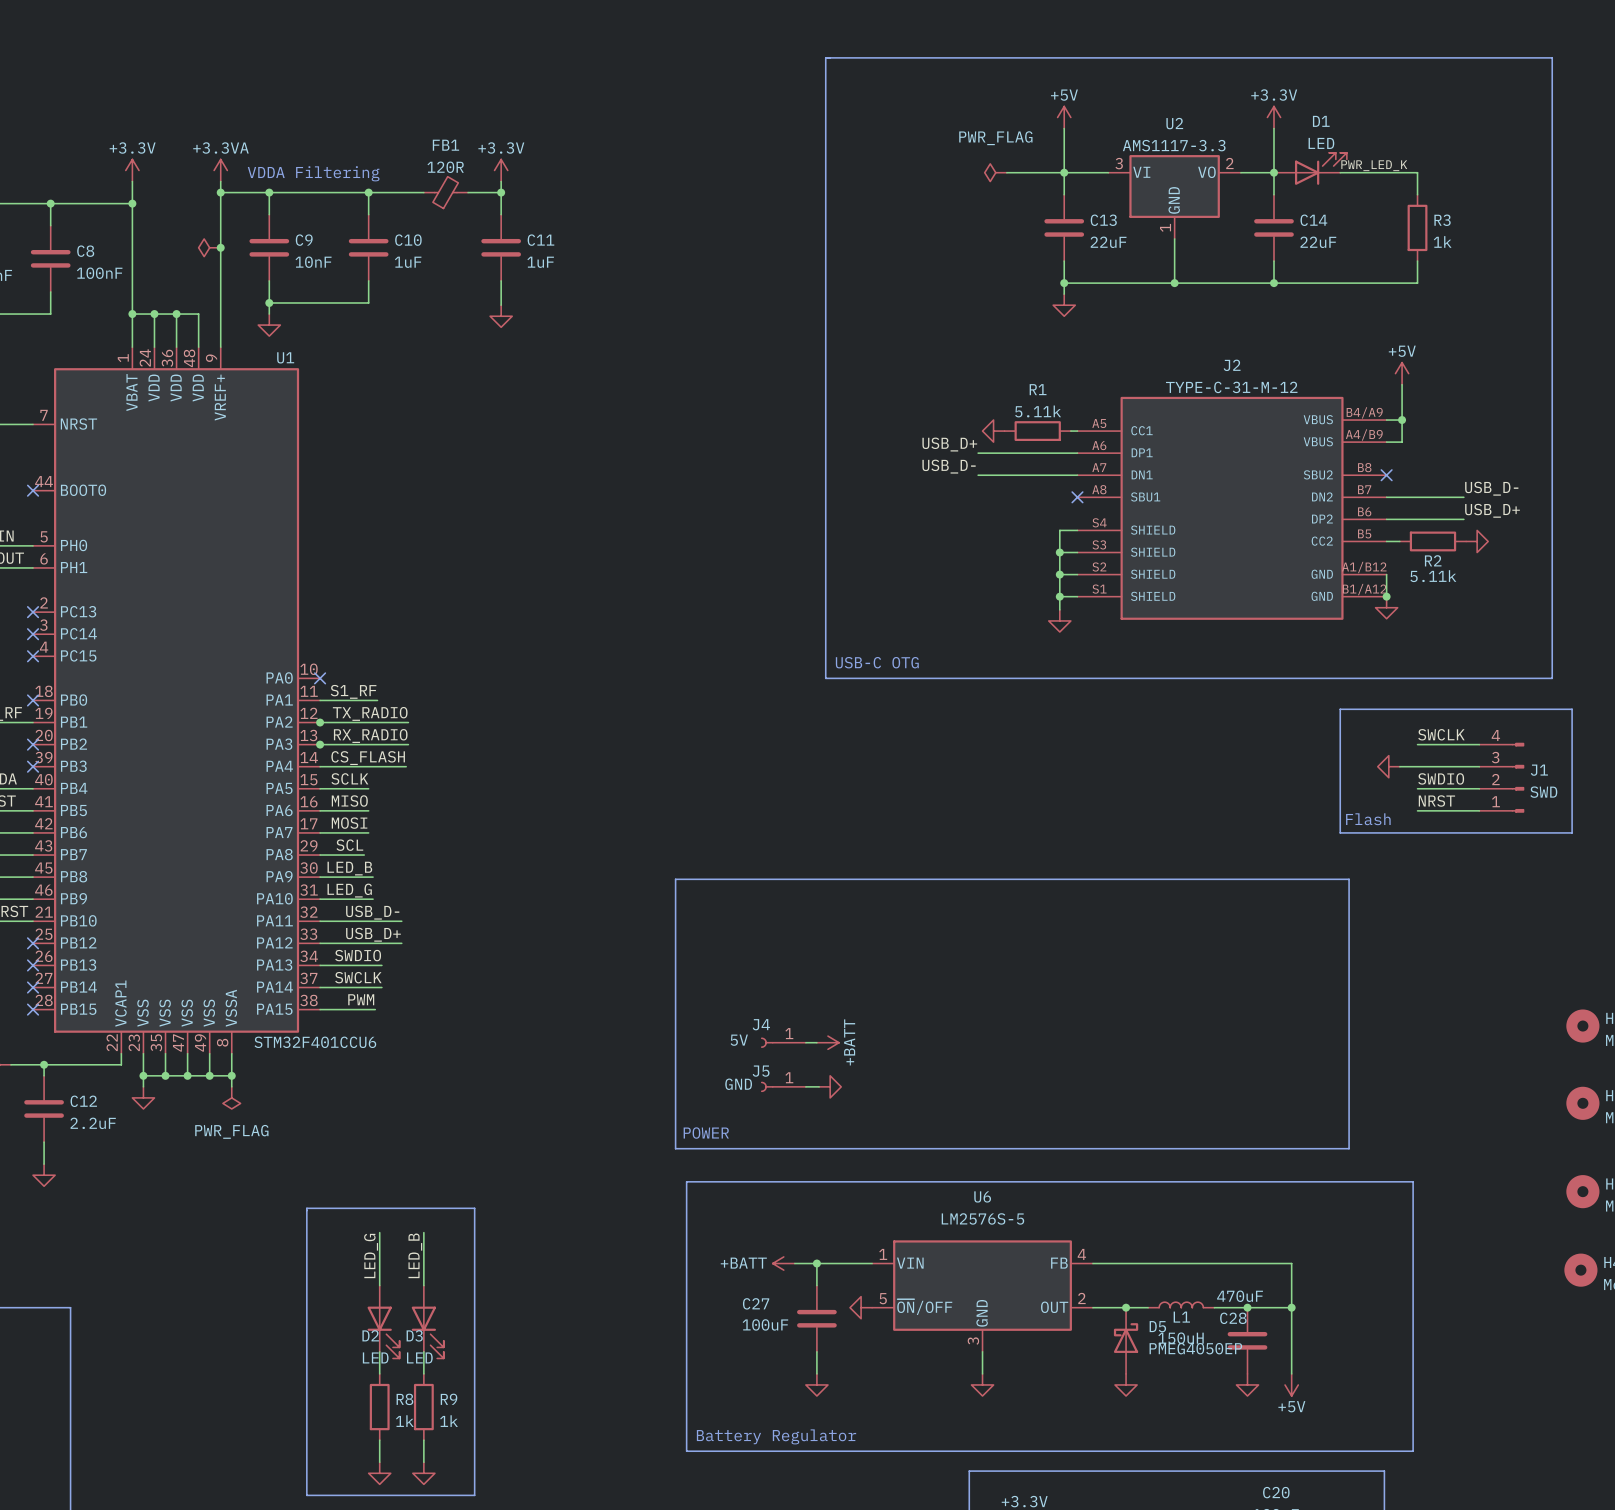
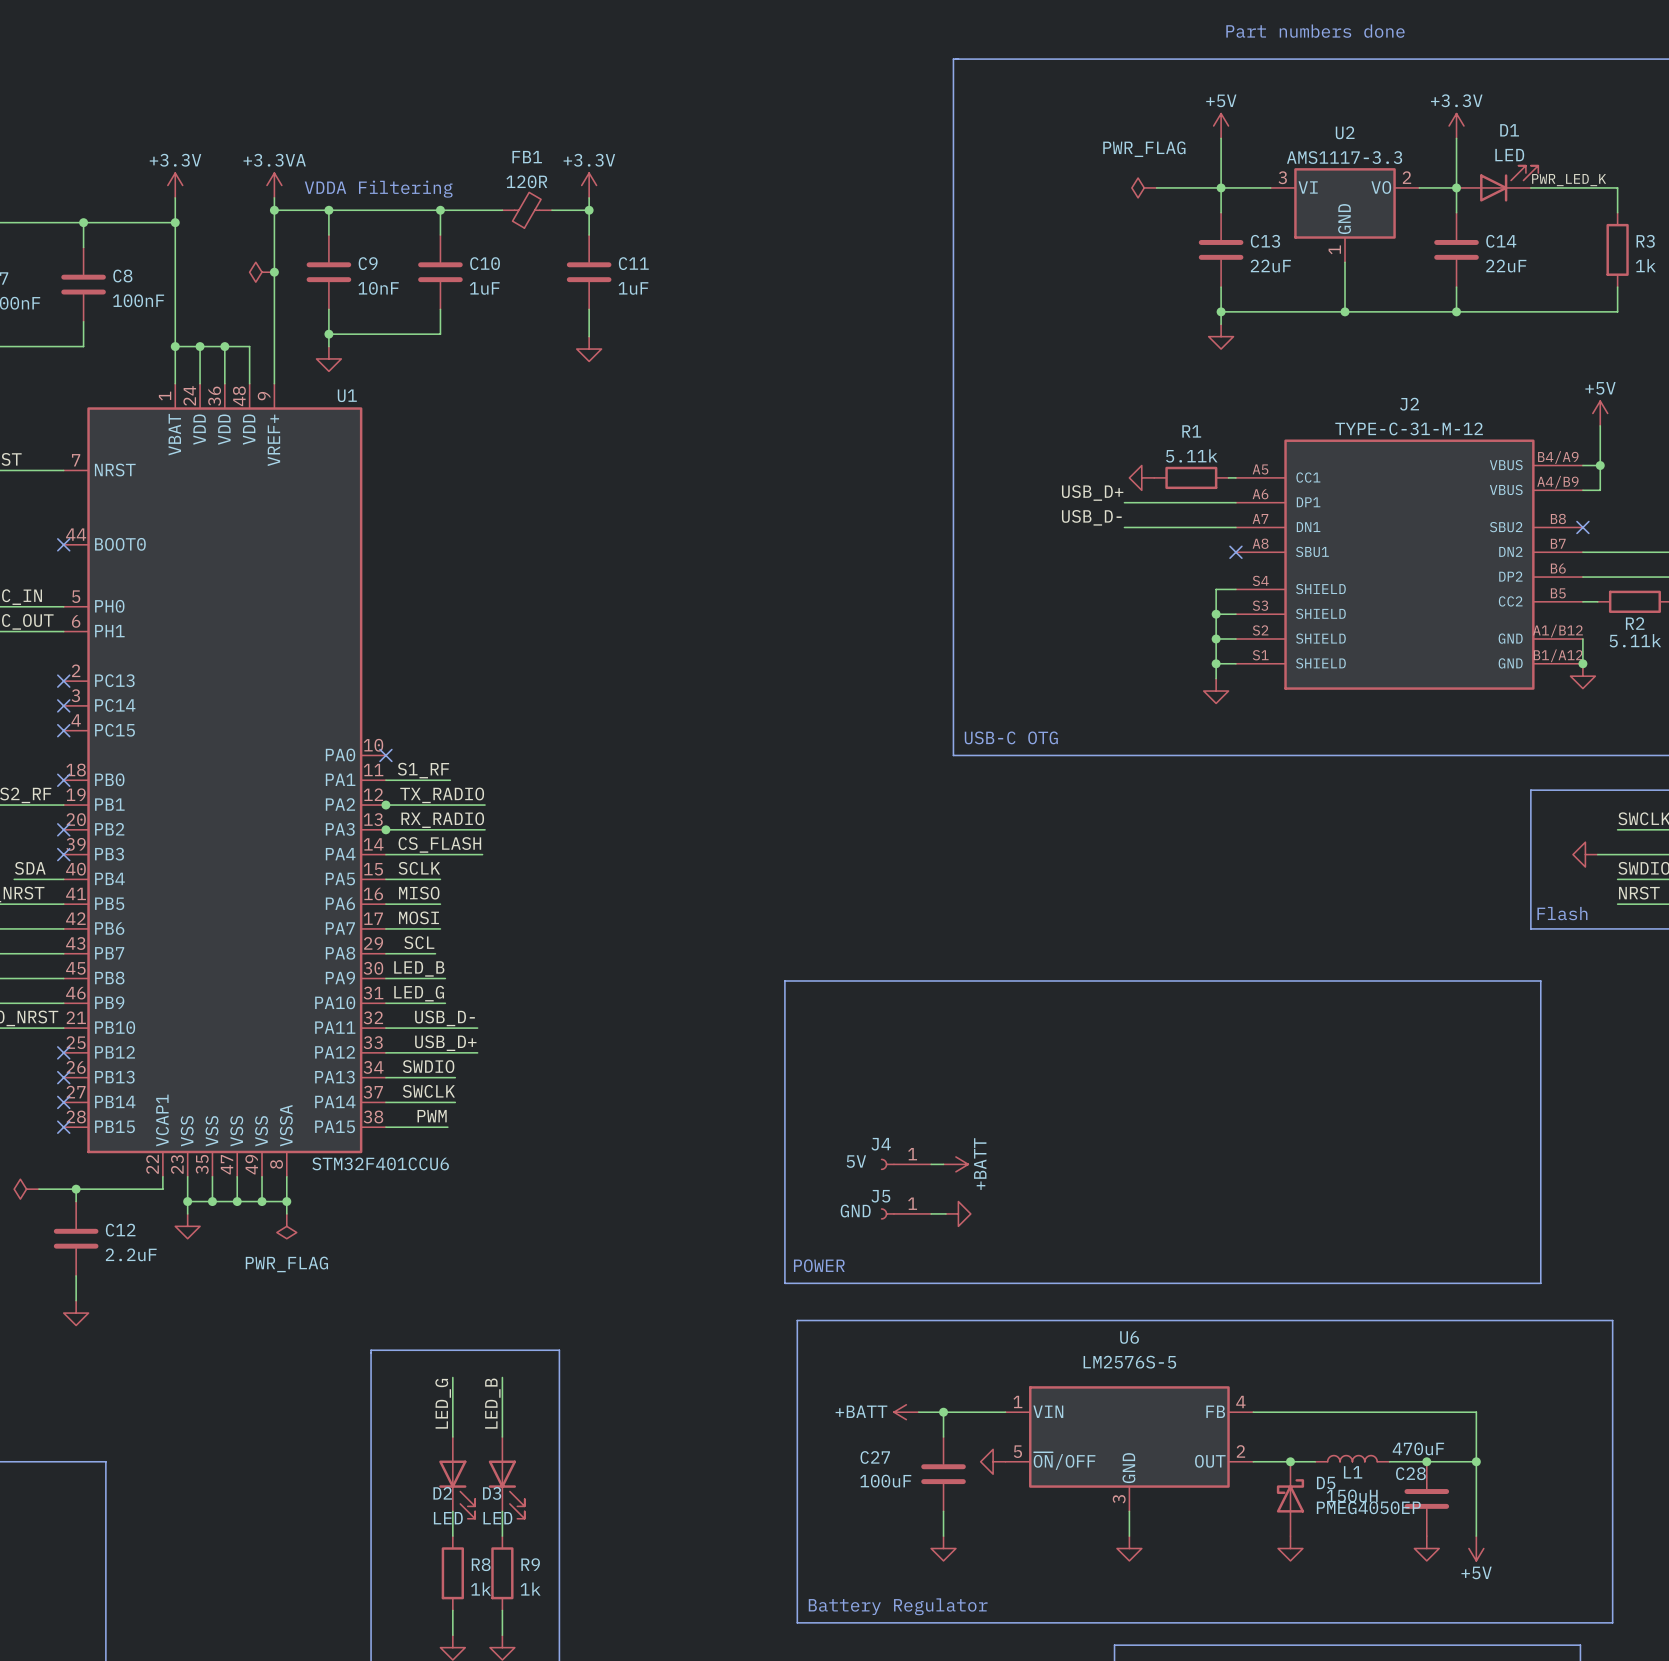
text: none -> Part numbers done (1315, 31)

